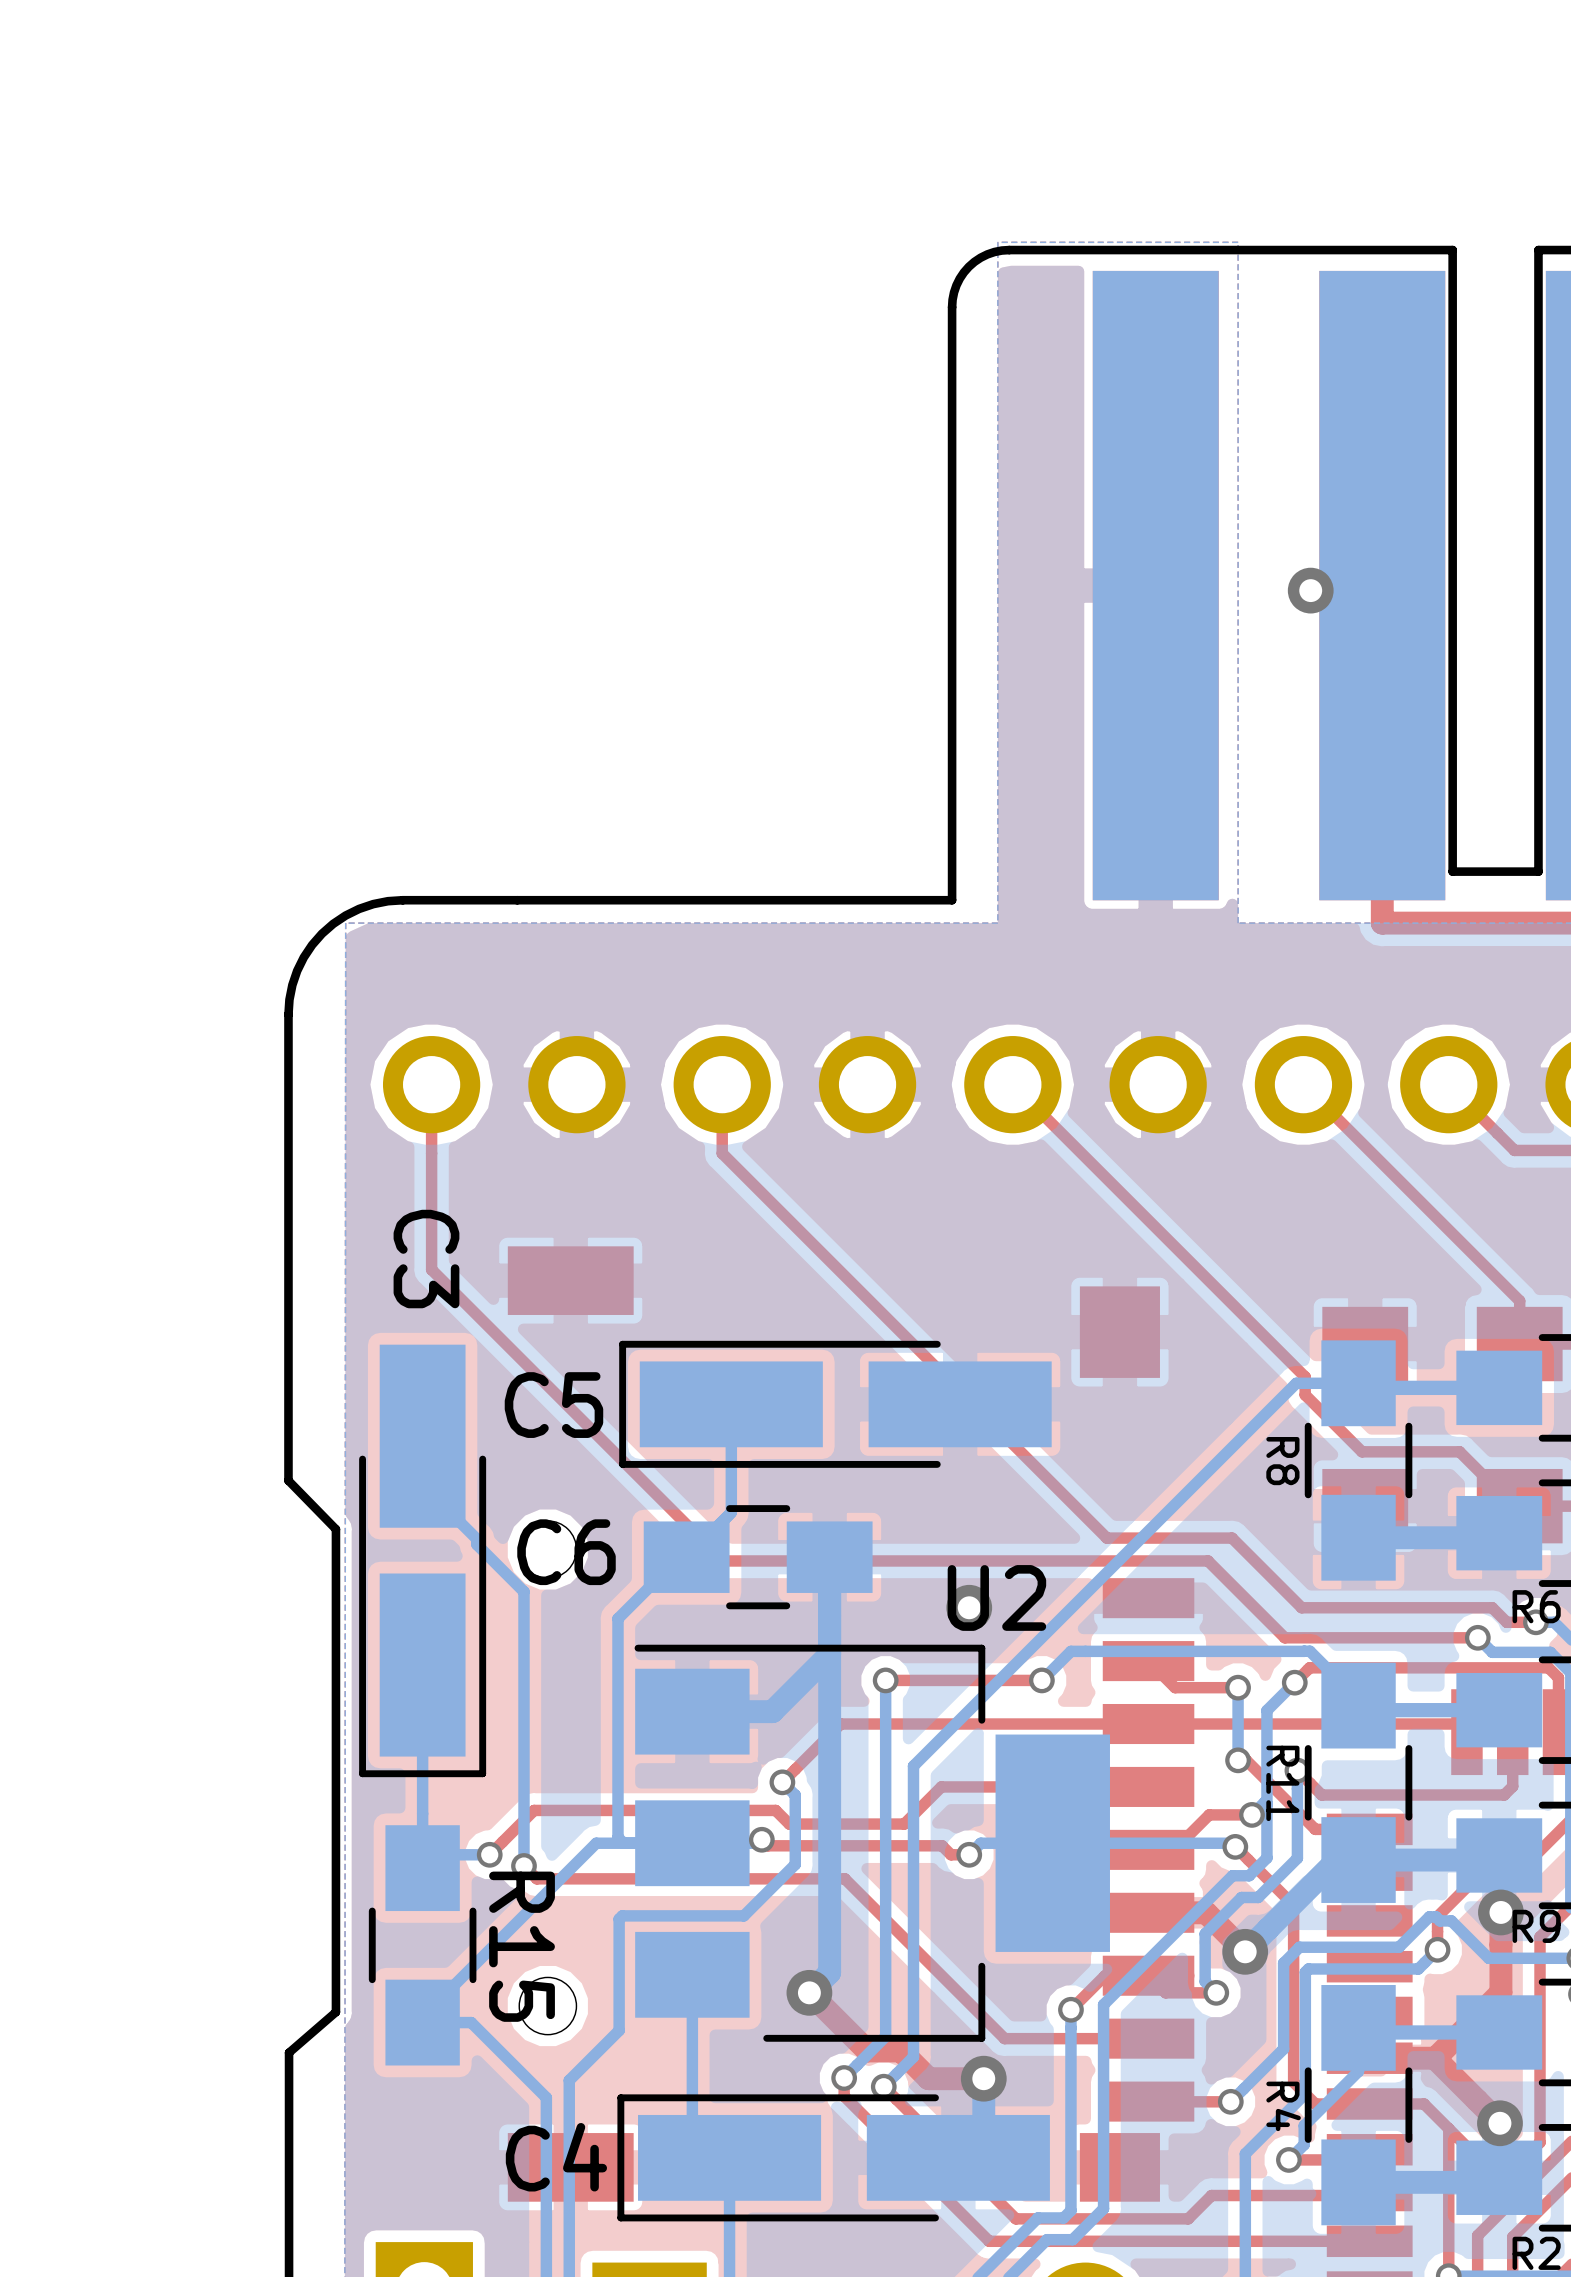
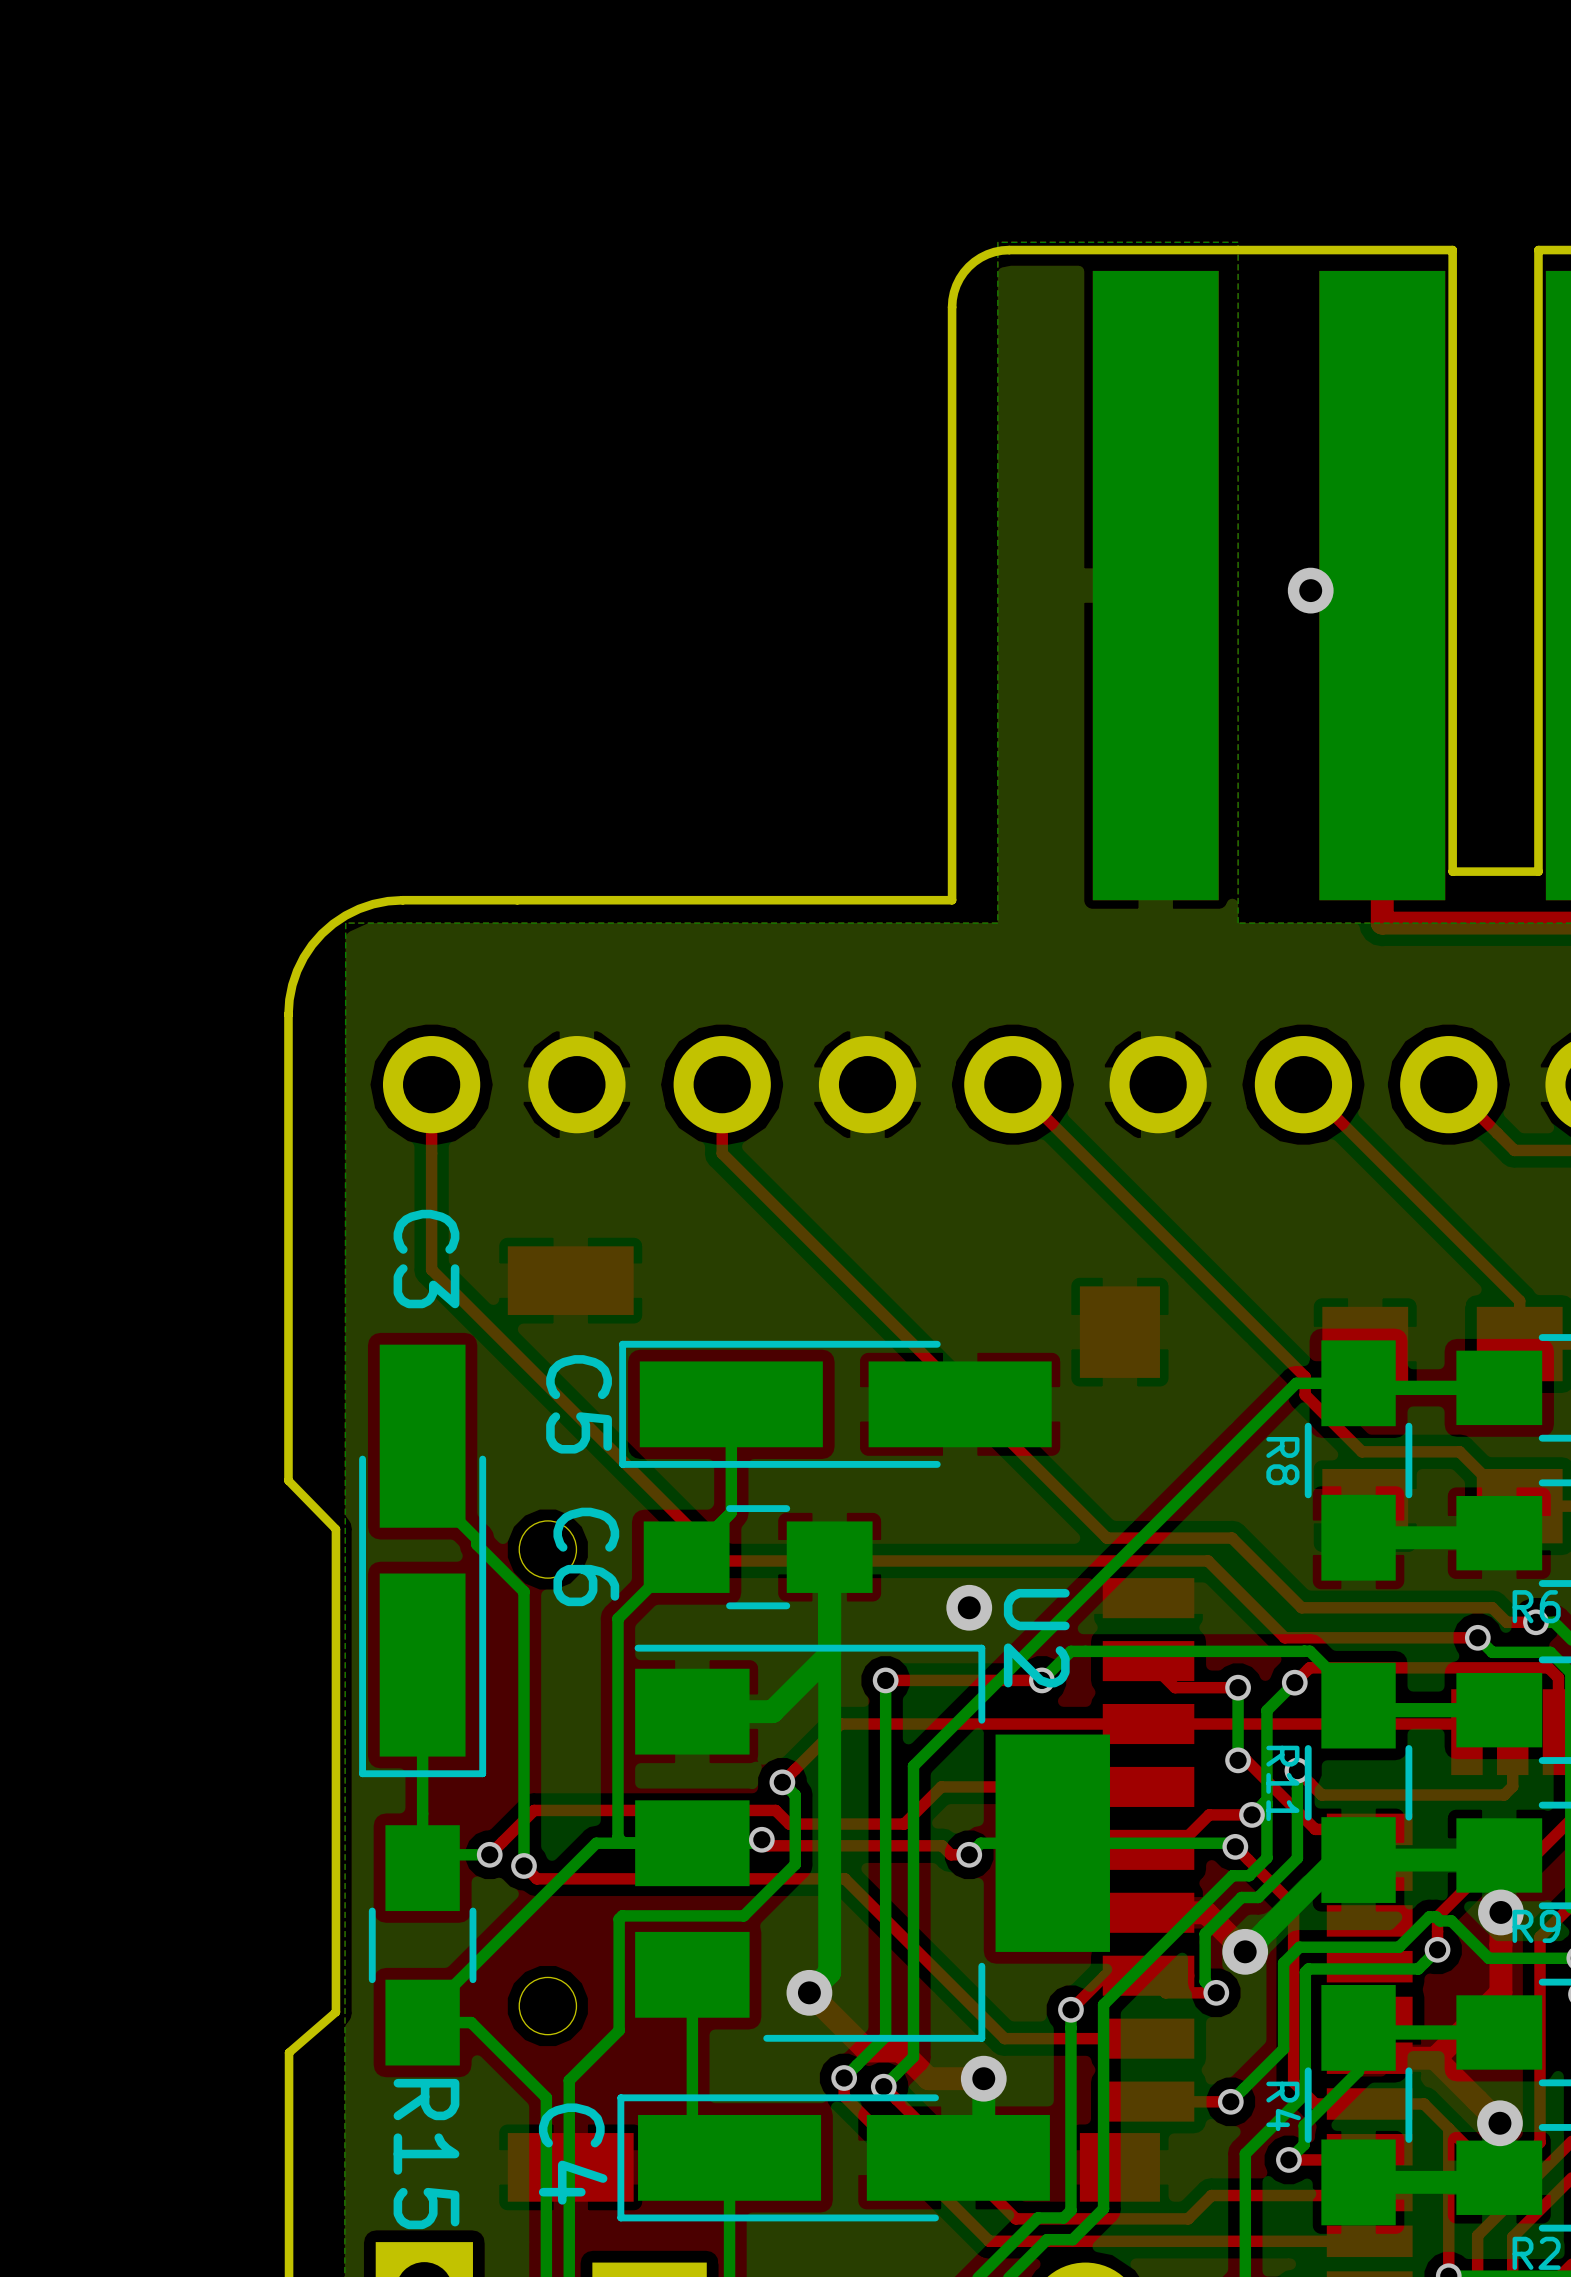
C5 name rotation: 0° (553, 1405) -> 90° clockwise (579, 1404)
C6 name rotation: 0° (566, 1552) -> 90° clockwise (586, 1556)
U2 name rotation: 0° (996, 1597) -> 90° clockwise (1036, 1638)
R15 name position: R15 (522, 1946) -> R15 (426, 2154)
C4 name rotation: 0° (556, 2157) -> 90° clockwise (573, 2154)

